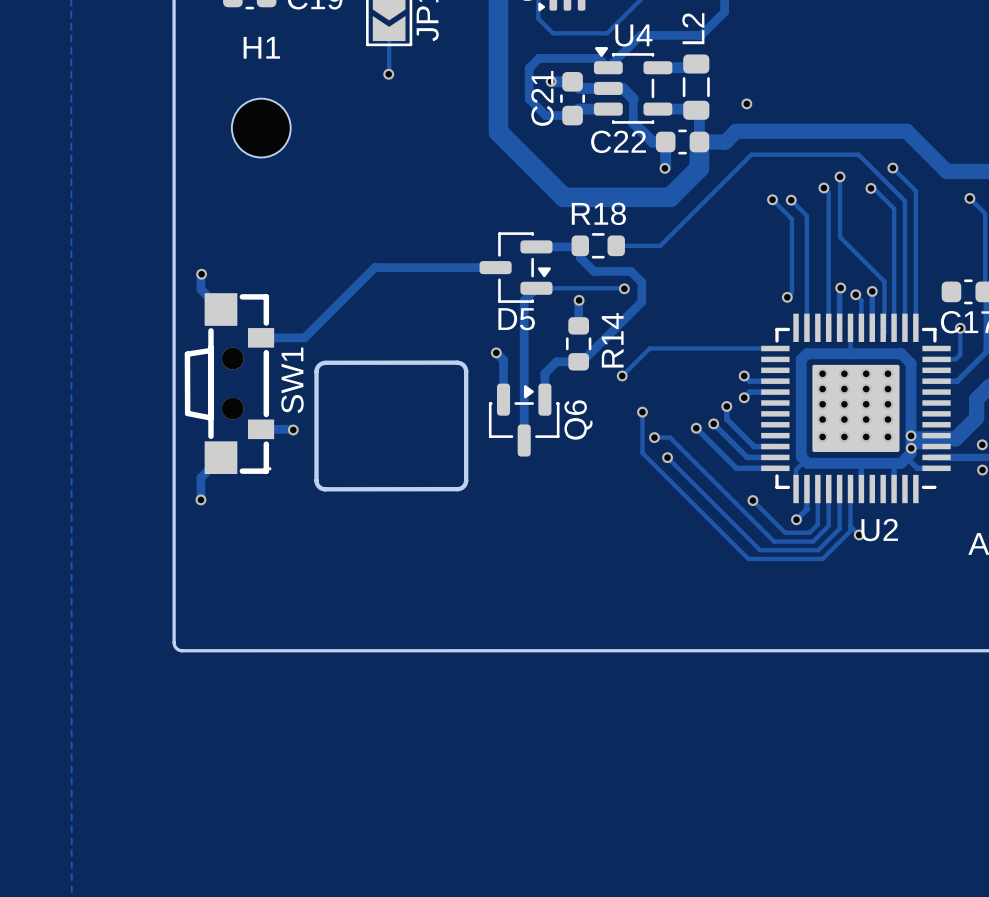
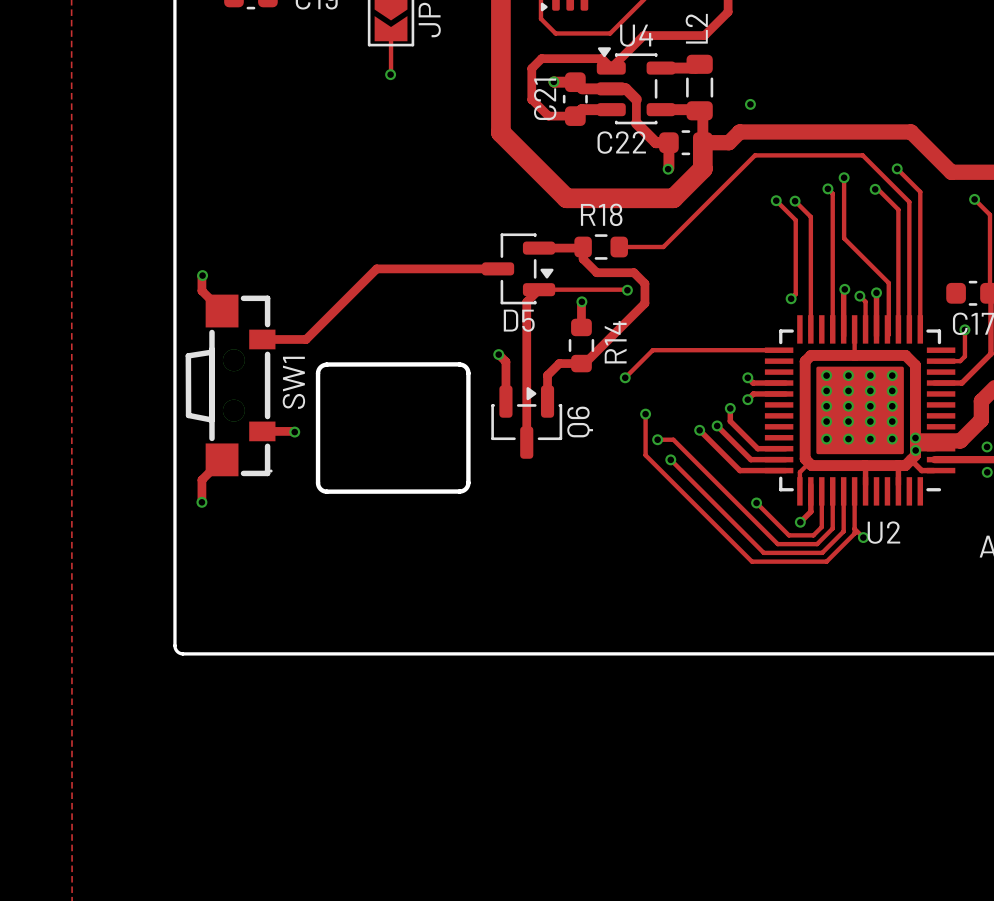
H1: (261, 128) -> none

